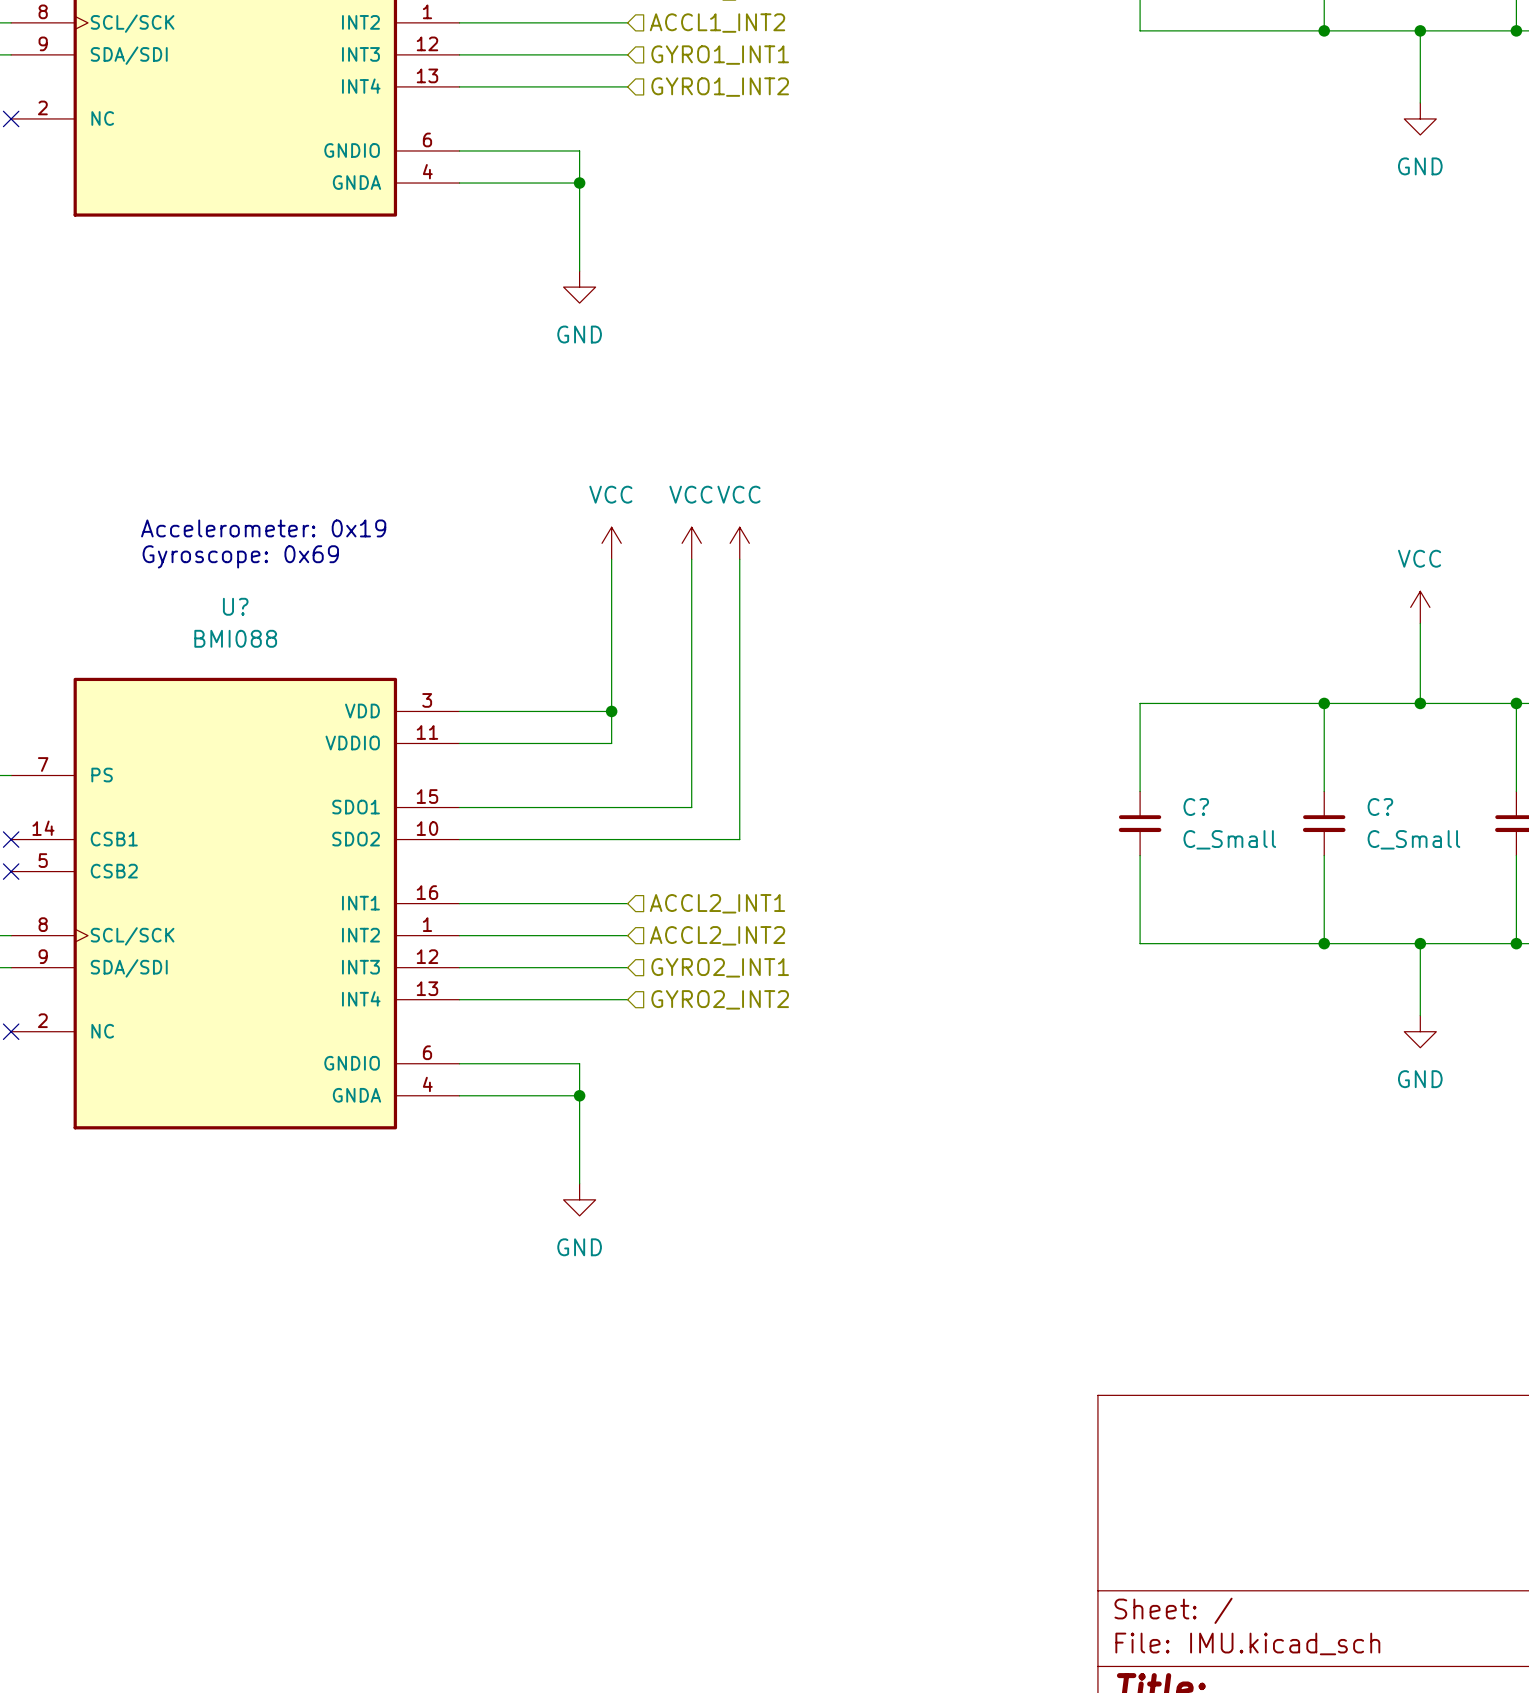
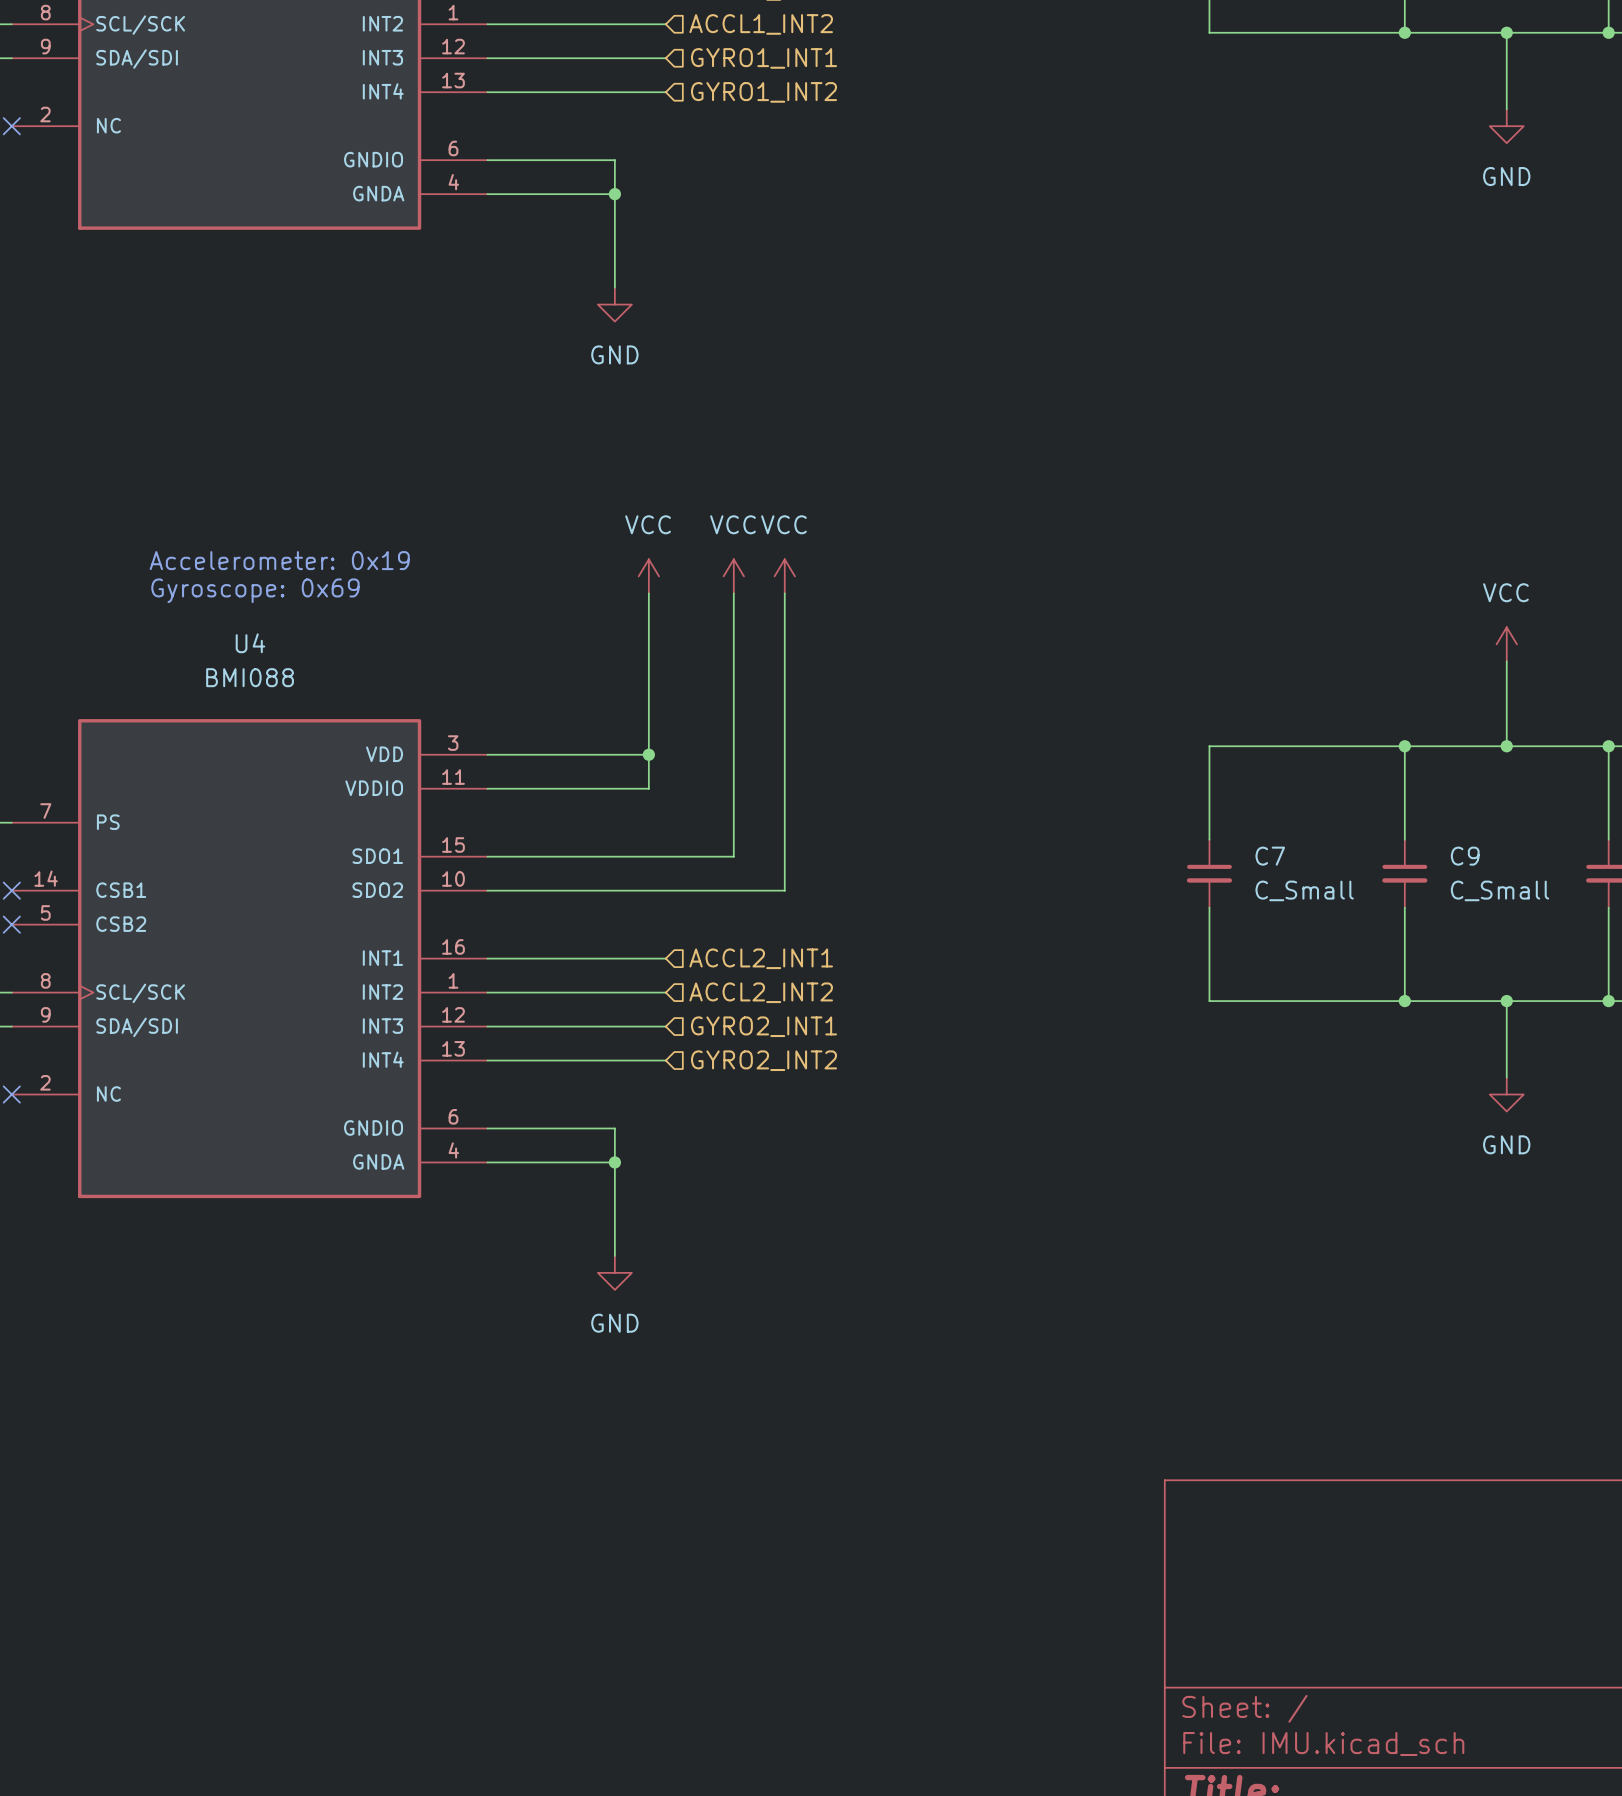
U? name: U? (235, 606) -> U4 (250, 643)
C? name: C? (1196, 807) -> C7 (1270, 856)
C? name: C? (1380, 807) -> C9 (1465, 856)

